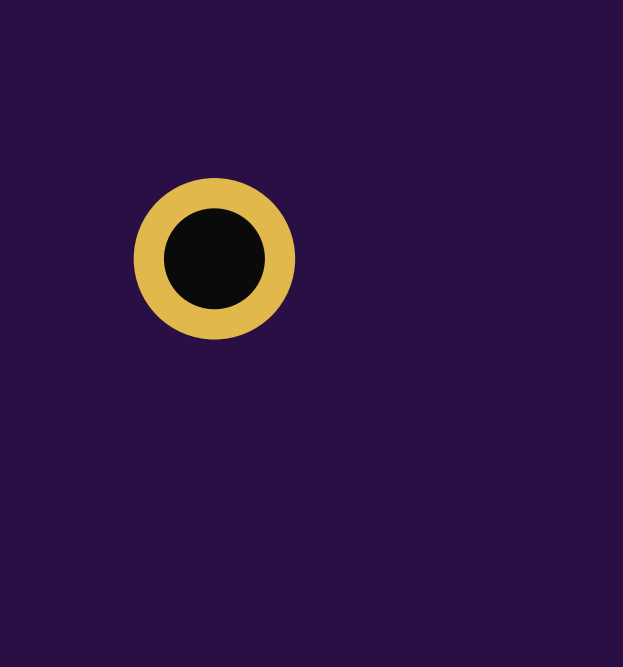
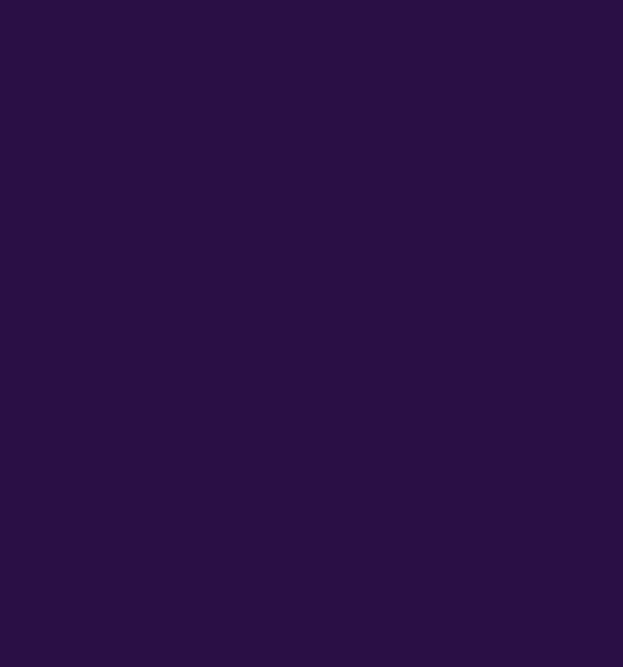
part: (214, 258) -> none

